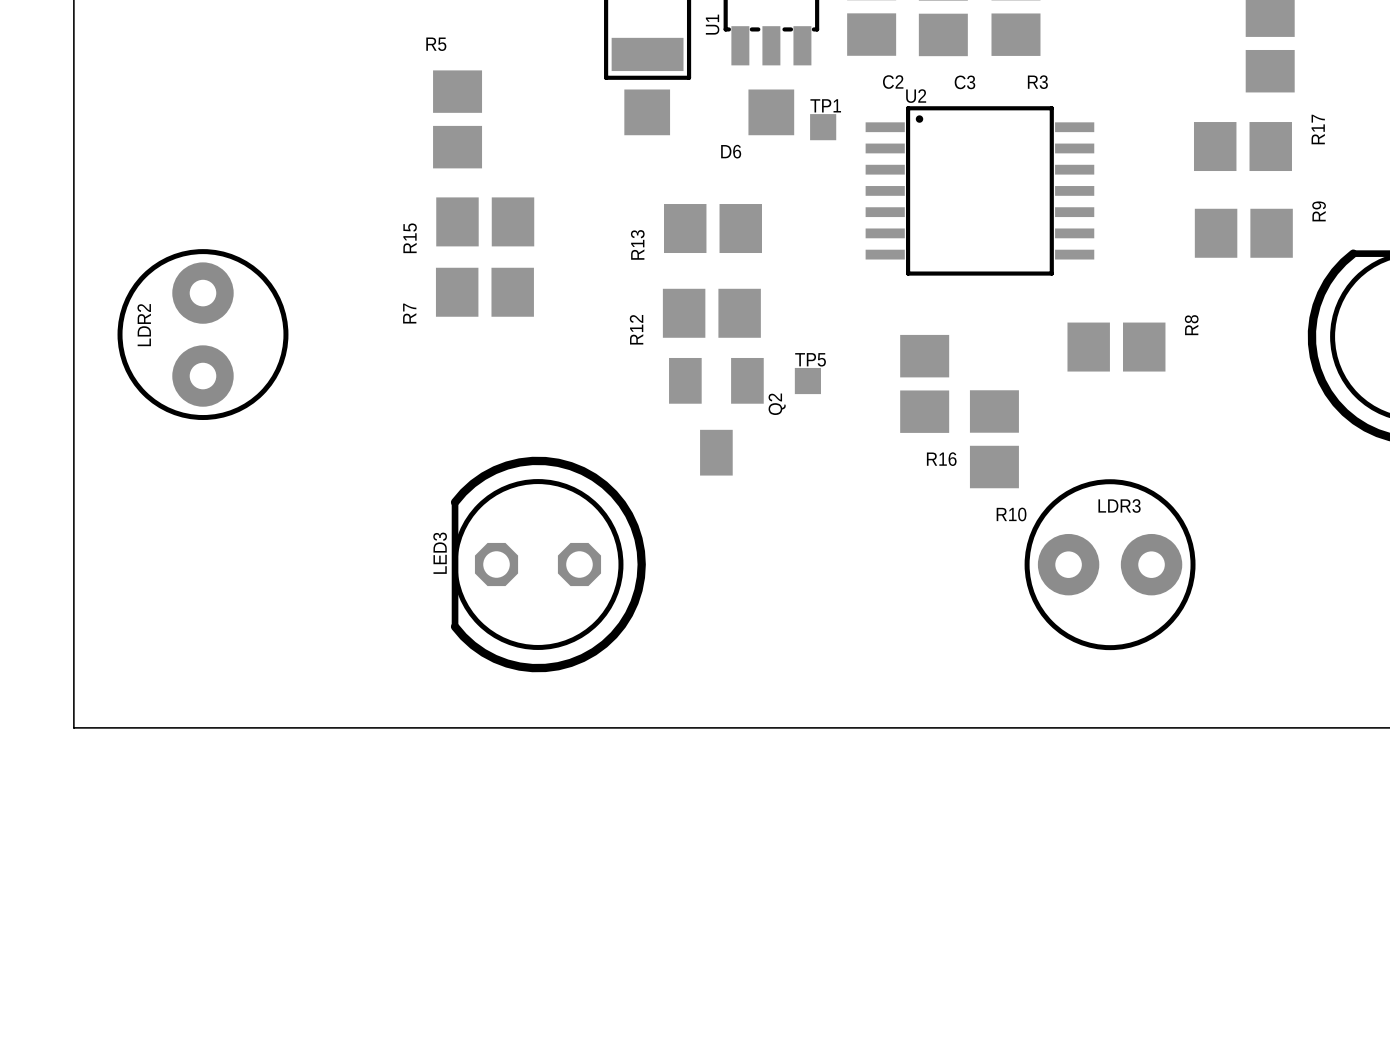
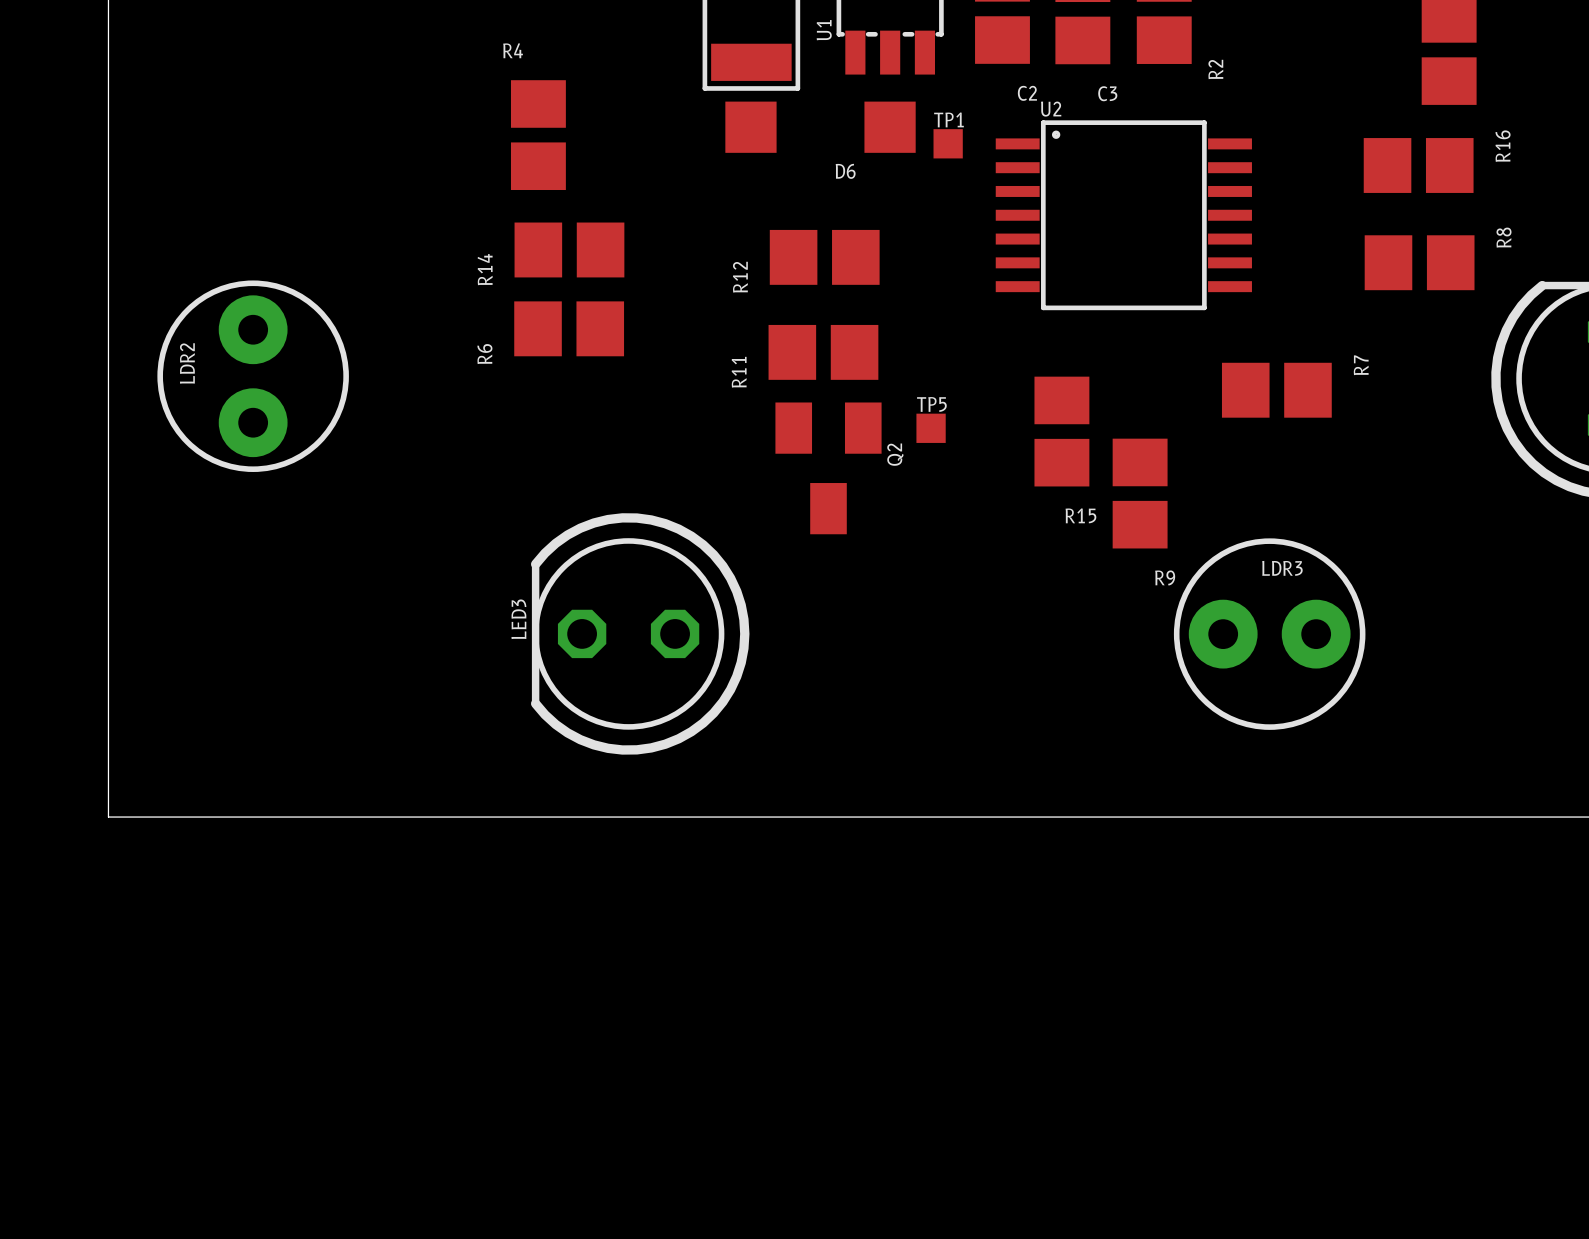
R5 name: R5 (436, 44) -> R4 (513, 50)
R3 name: R3 (1037, 82) -> R2 (1215, 69)
R17 name: R17 (1318, 129) -> R16 (1503, 146)
R9 name: R9 (1319, 211) -> R8 (1504, 237)
R15 name: R15 (410, 238) -> R14 (485, 269)
R13 name: R13 (637, 244) -> R12 (740, 277)
R7 name: R7 (409, 313) -> R6 (484, 354)
R8 name: R8 (1191, 325) -> R7 (1361, 365)
R12 name: R12 (636, 329) -> R11 (739, 372)
R16 name: R16 (941, 459) -> R15 (1080, 515)
R10 name: R10 (1011, 514) -> R9 (1165, 577)

